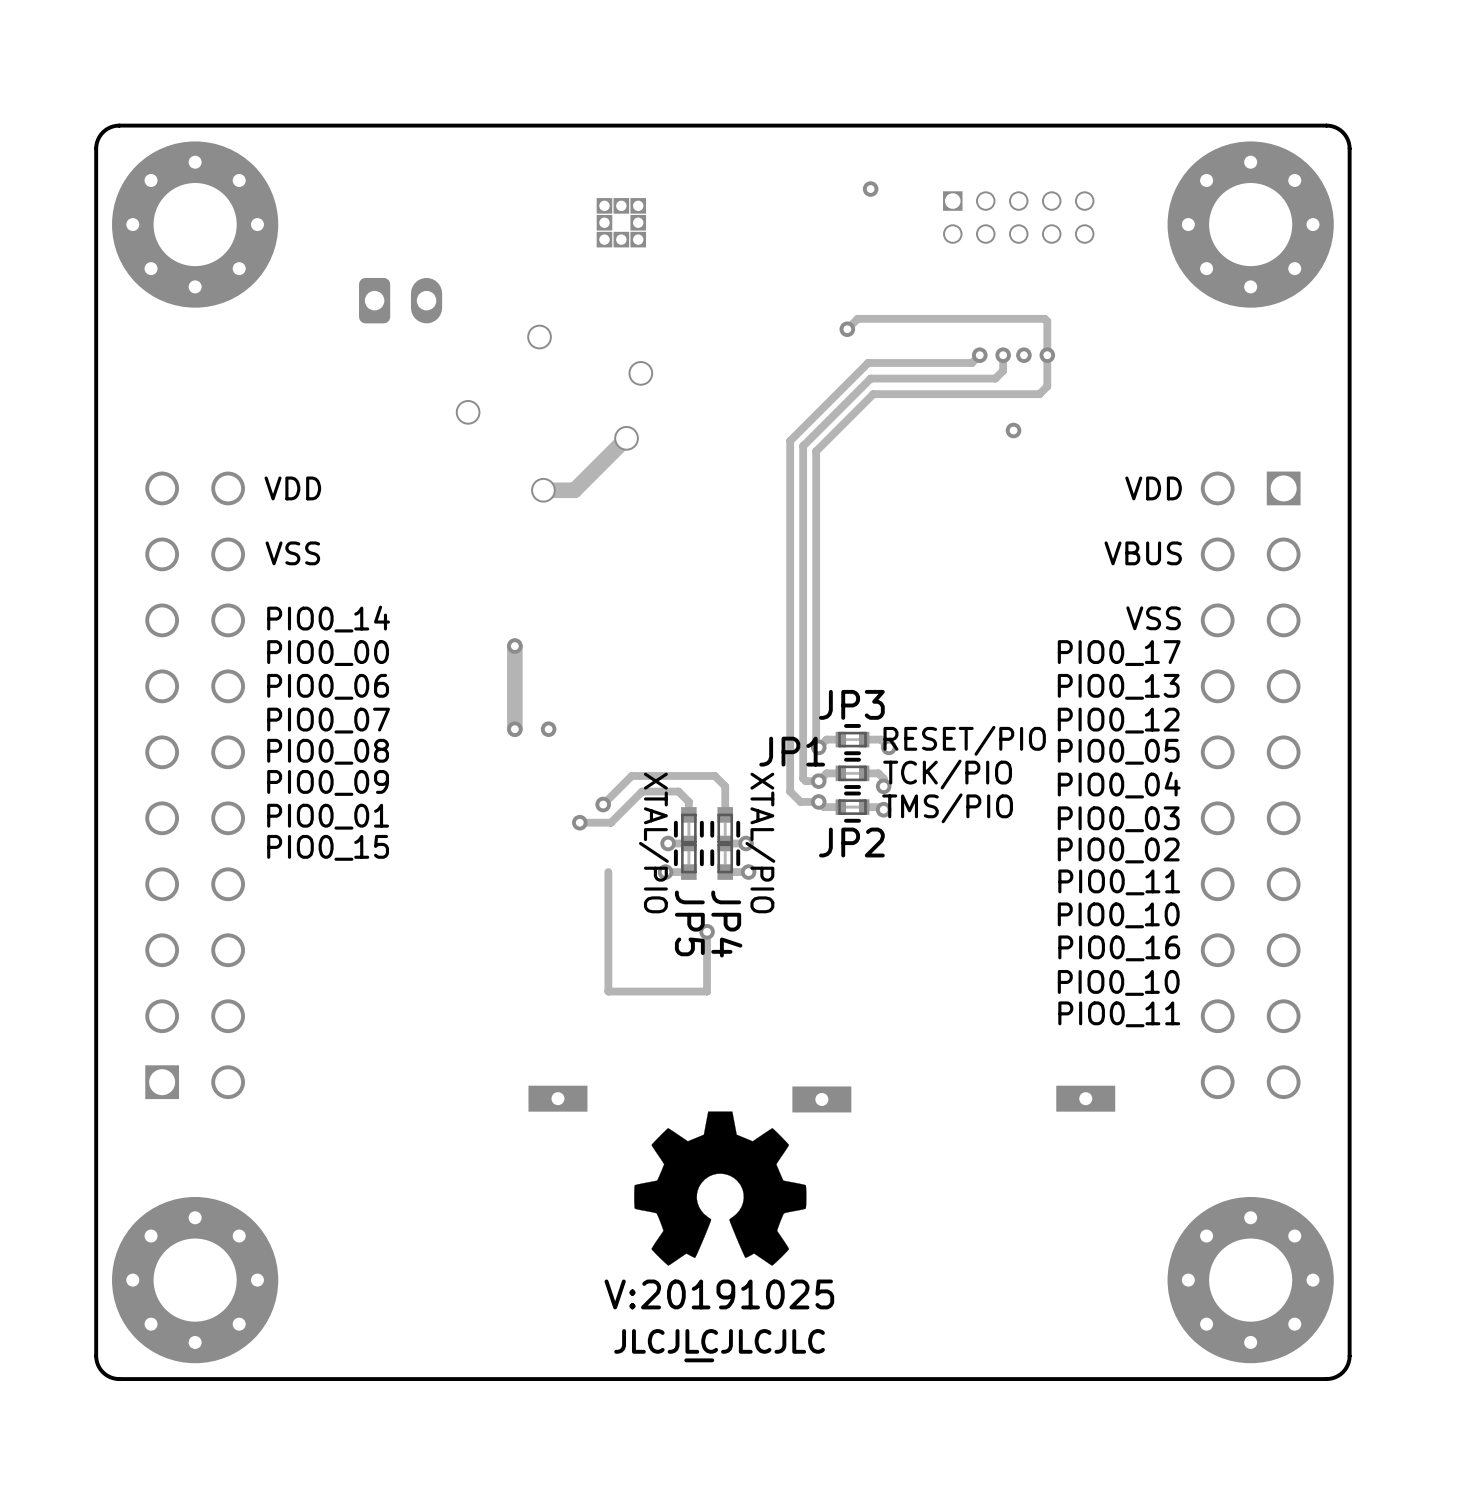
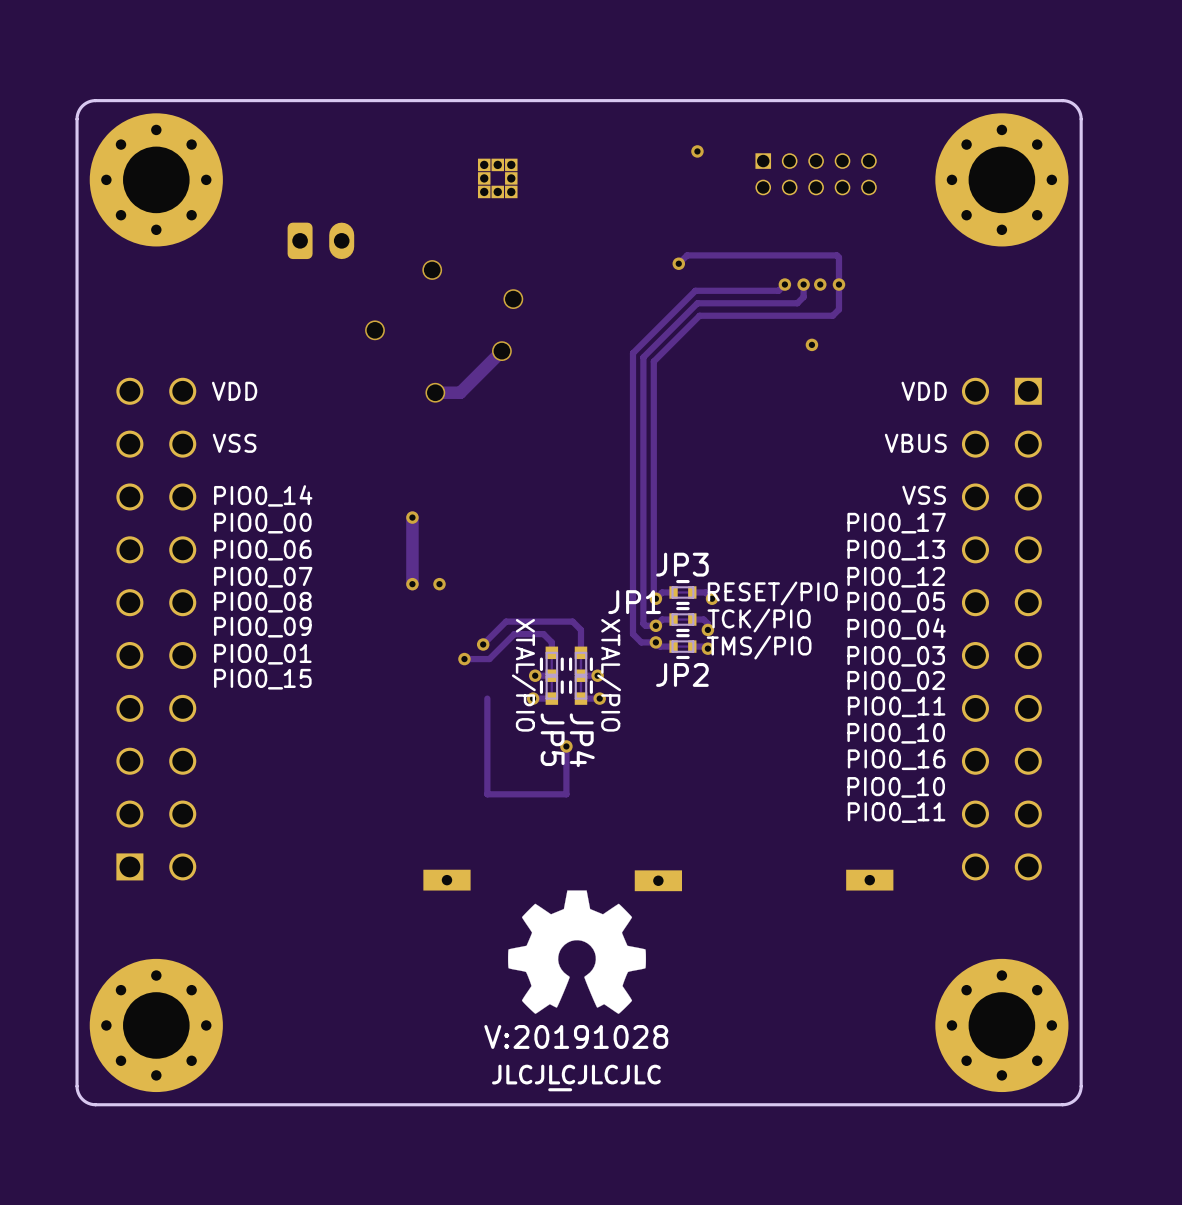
drawing shape: [604, 1279, 835, 1310] -> [484, 1025, 669, 1049]

